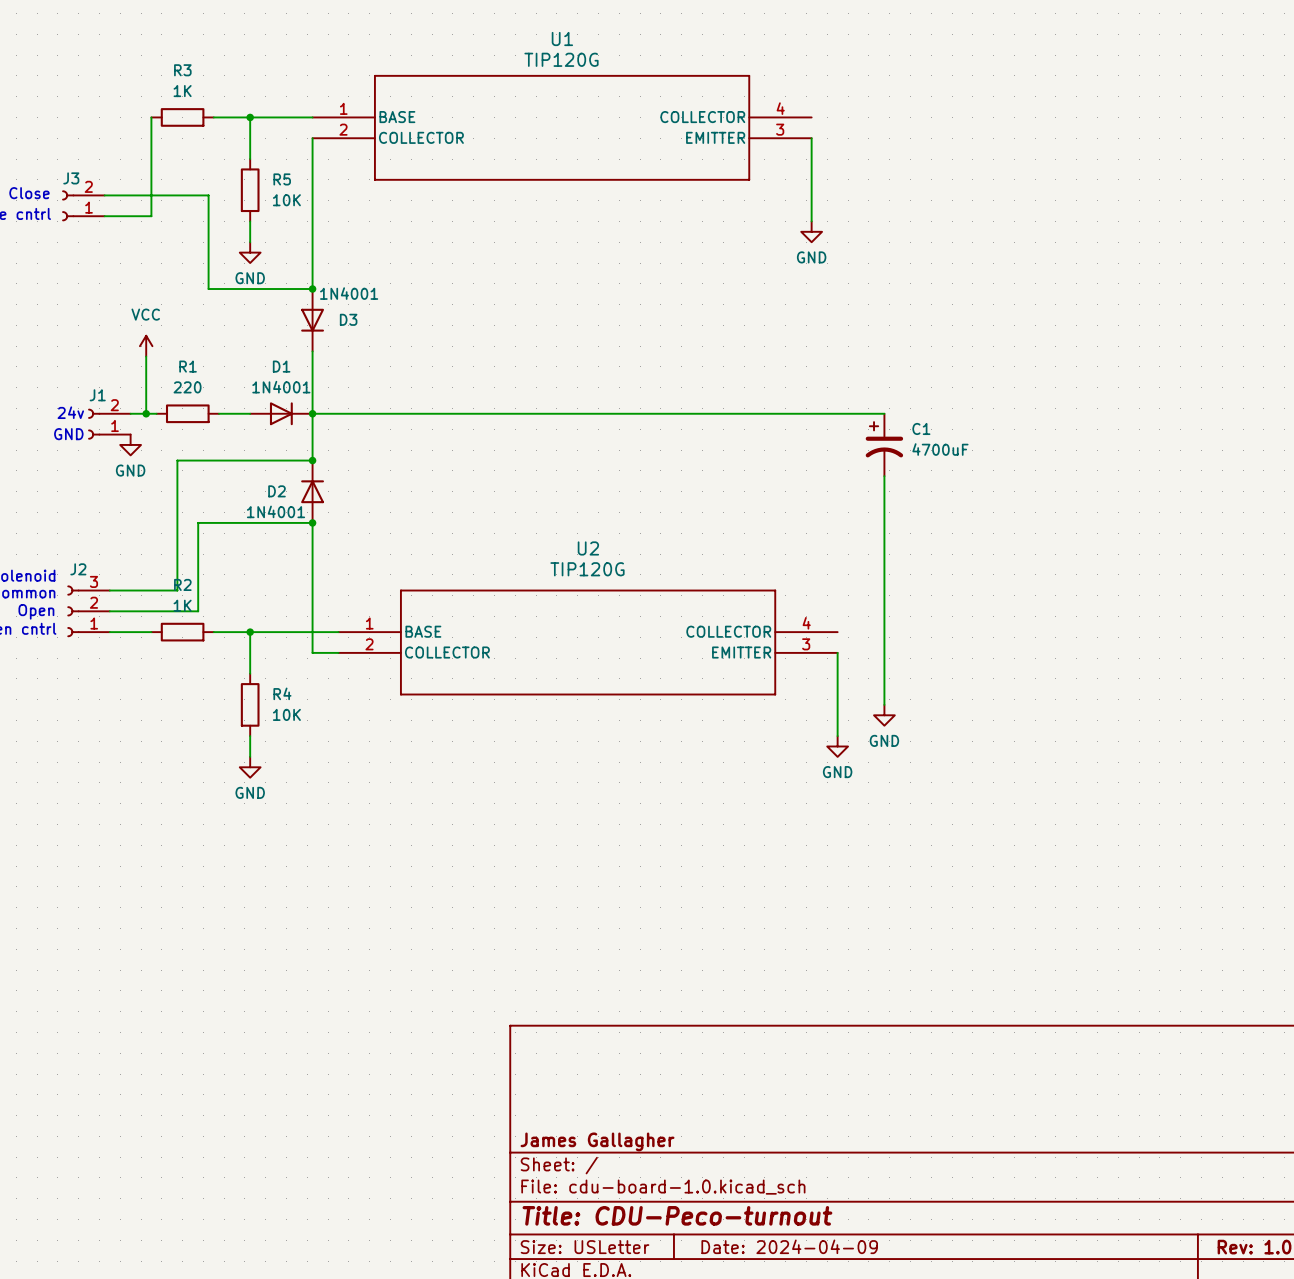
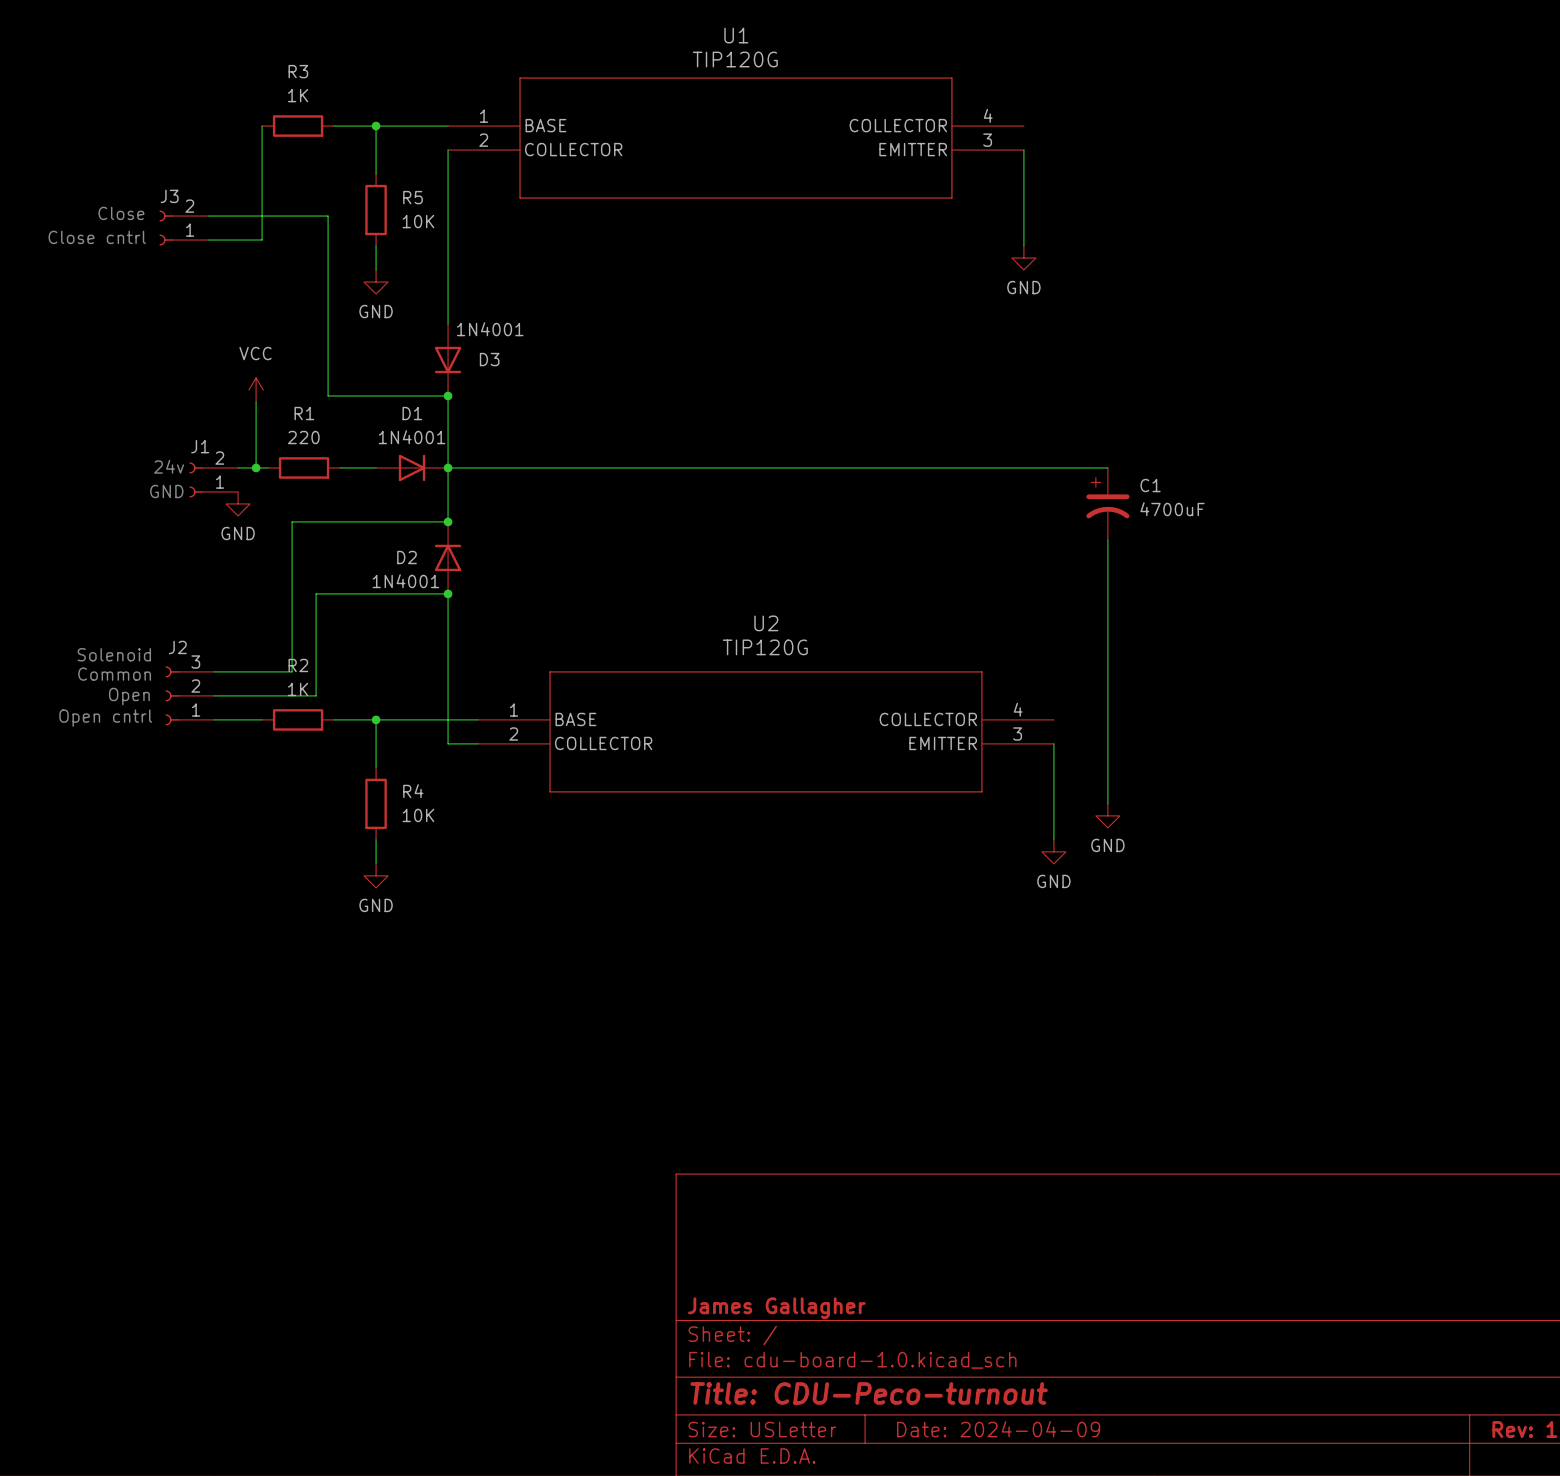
wire: (208, 289) (312, 289) -> (328, 324) (328, 395) (448, 395)
junction: (312, 289) -> none
junction: none -> (448, 395)

